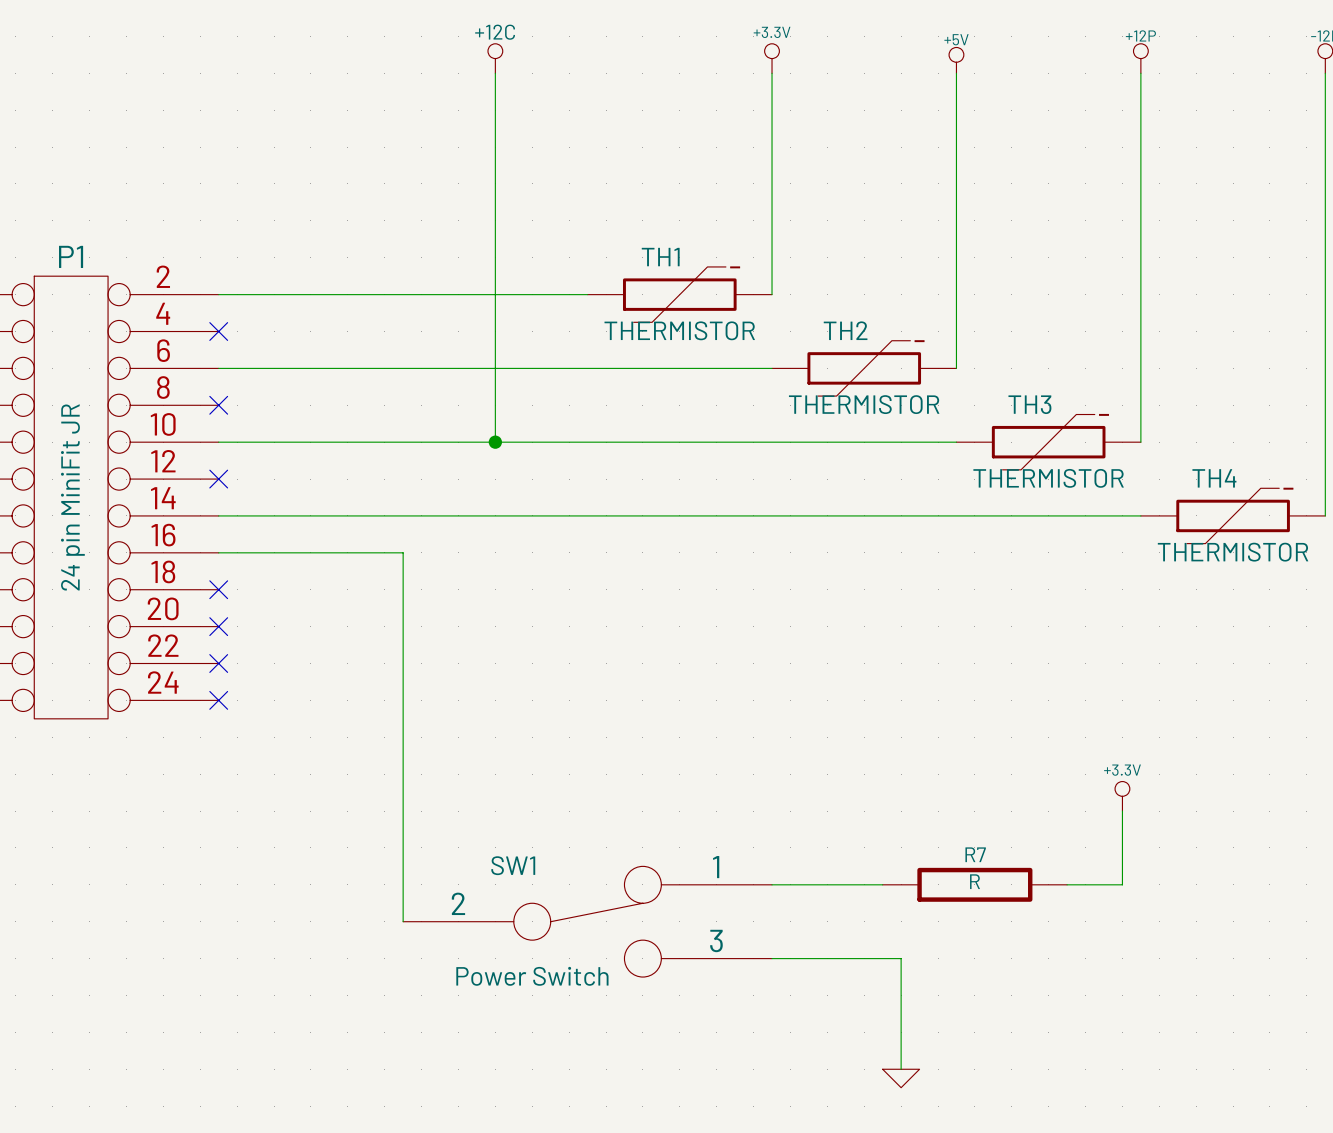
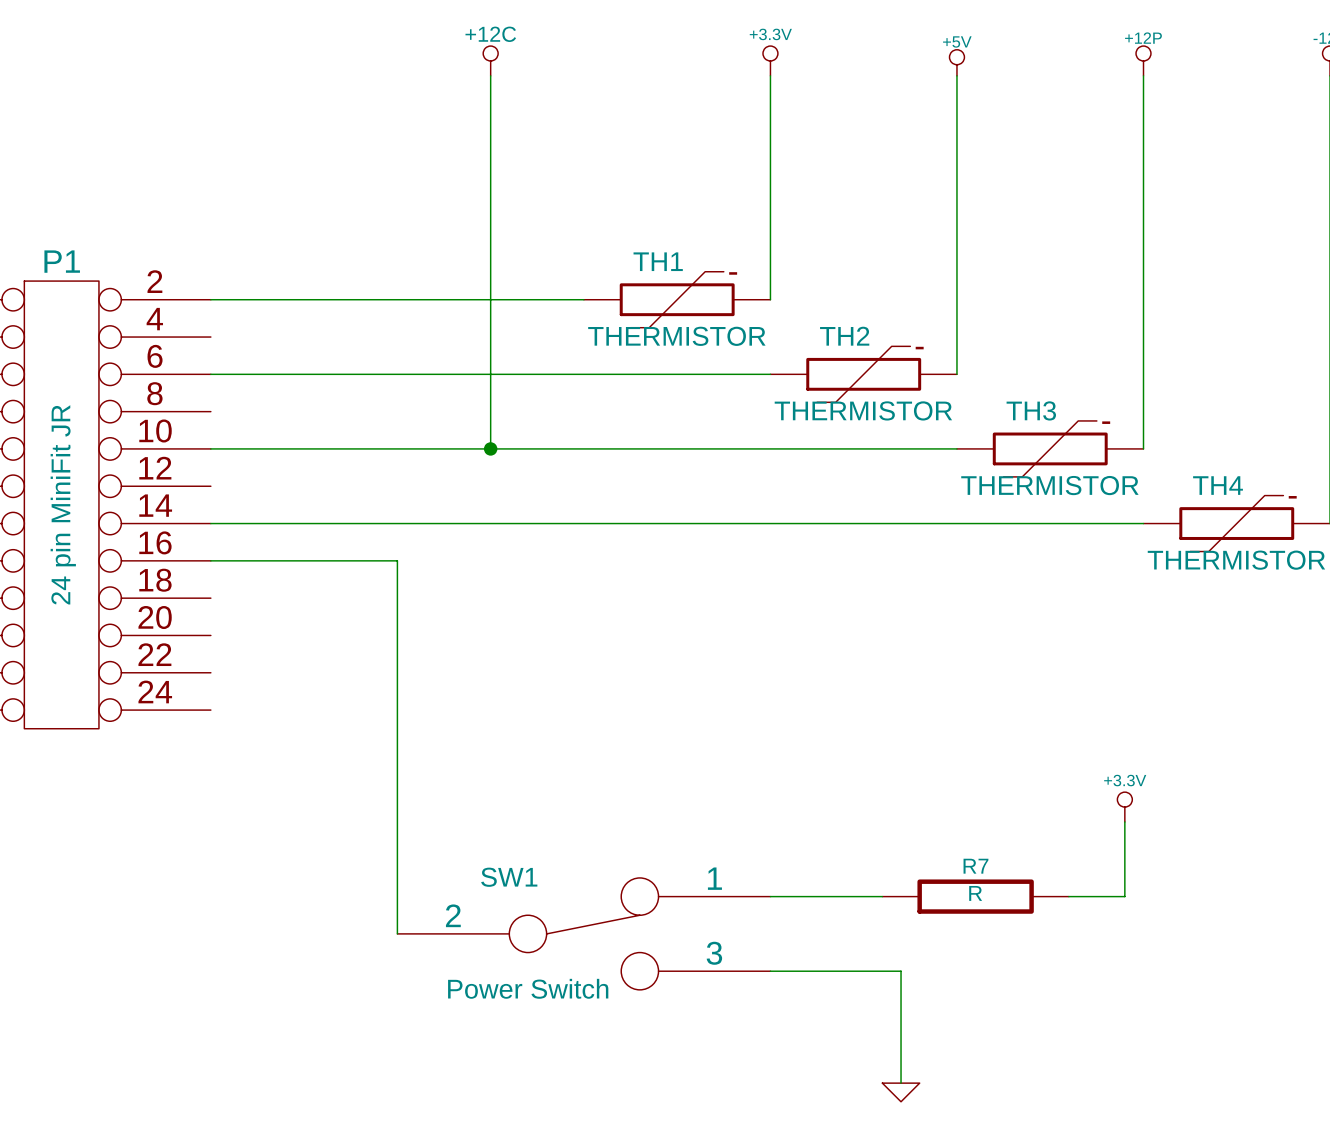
no-connect mark: (218, 331) -> none
no-connect mark: (218, 405) -> none
no-connect mark: (218, 479) -> none
no-connect mark: (218, 589) -> none
no-connect mark: (218, 626) -> none
no-connect mark: (218, 663) -> none
no-connect mark: (218, 700) -> none

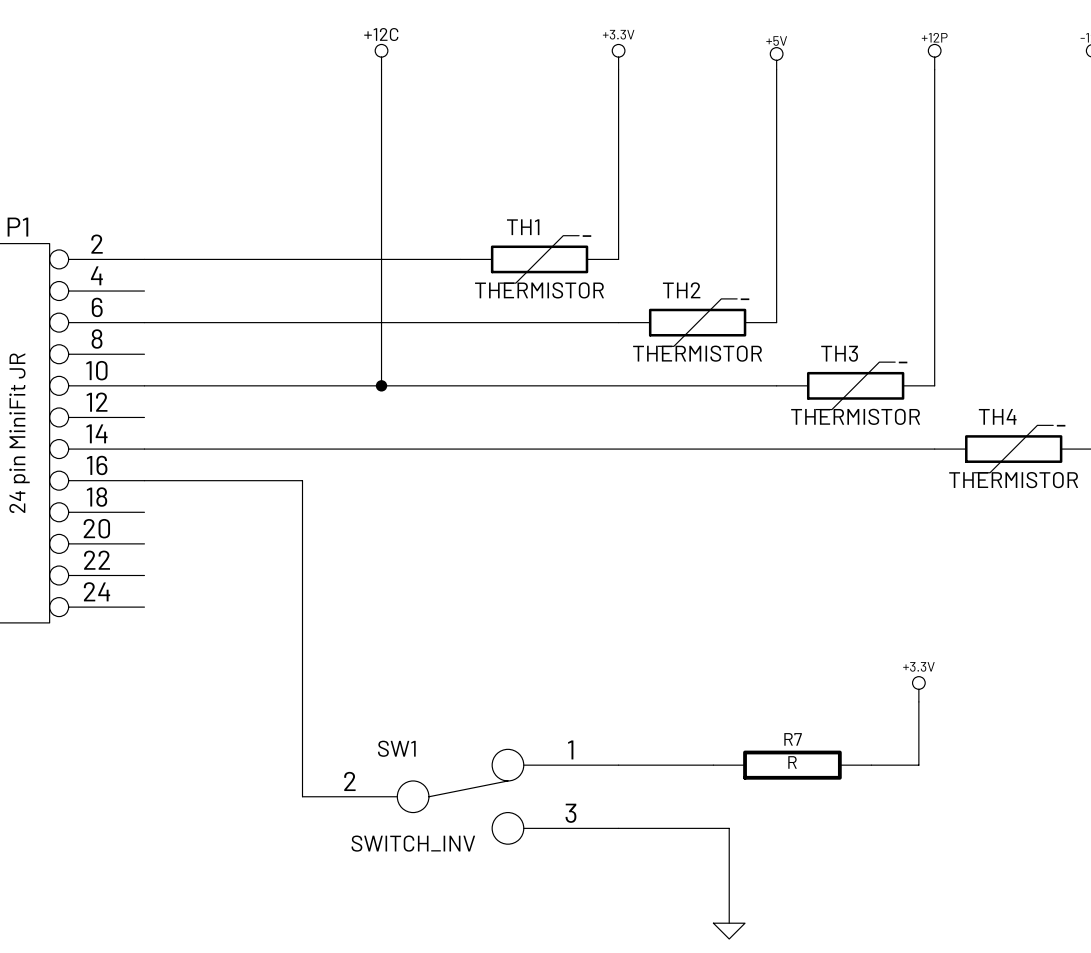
SW1 value: Power Switch (528, 988) -> SWITCH_INV (413, 843)

